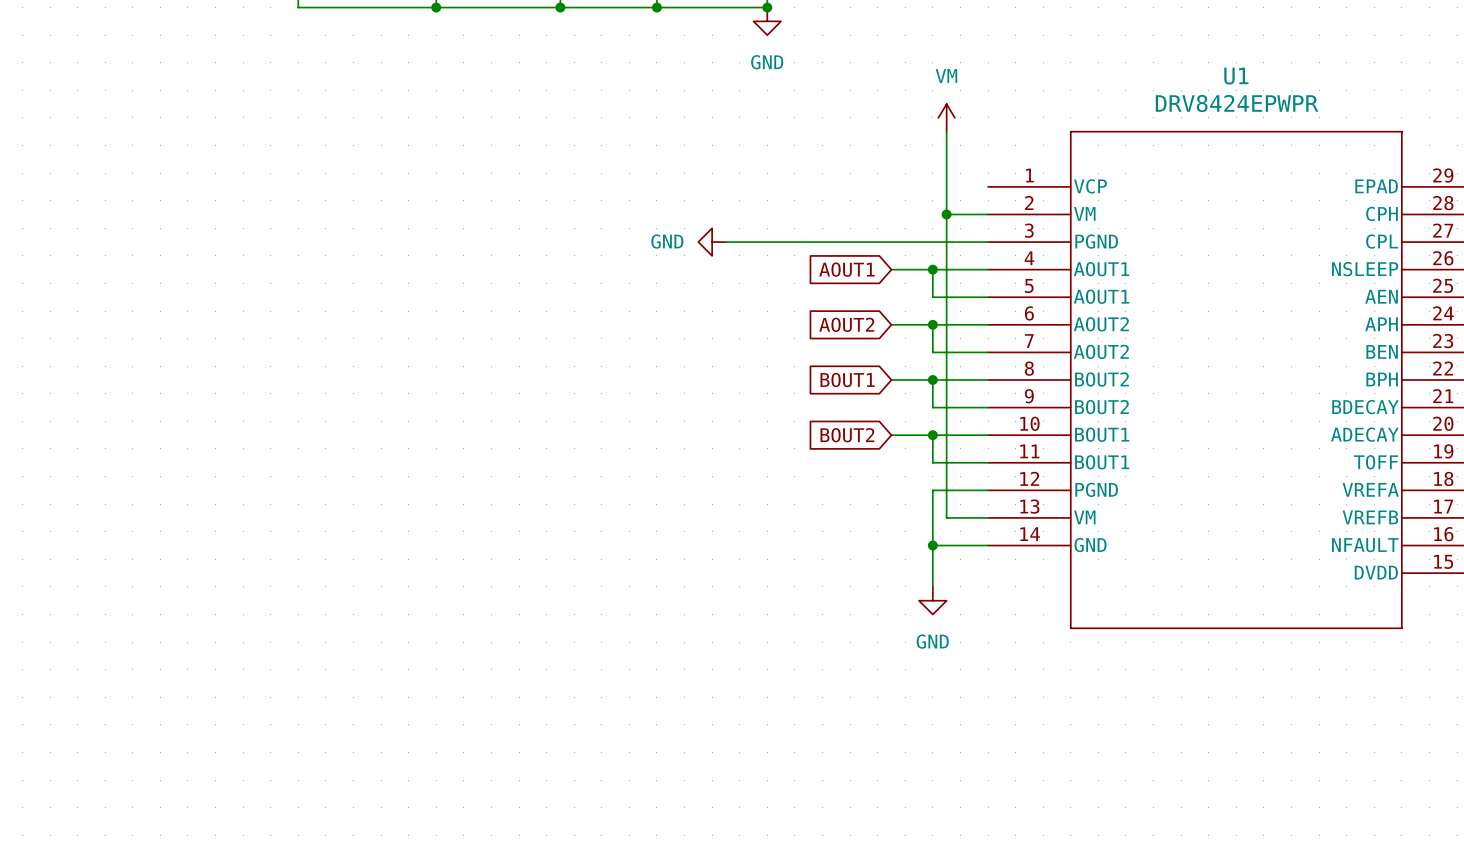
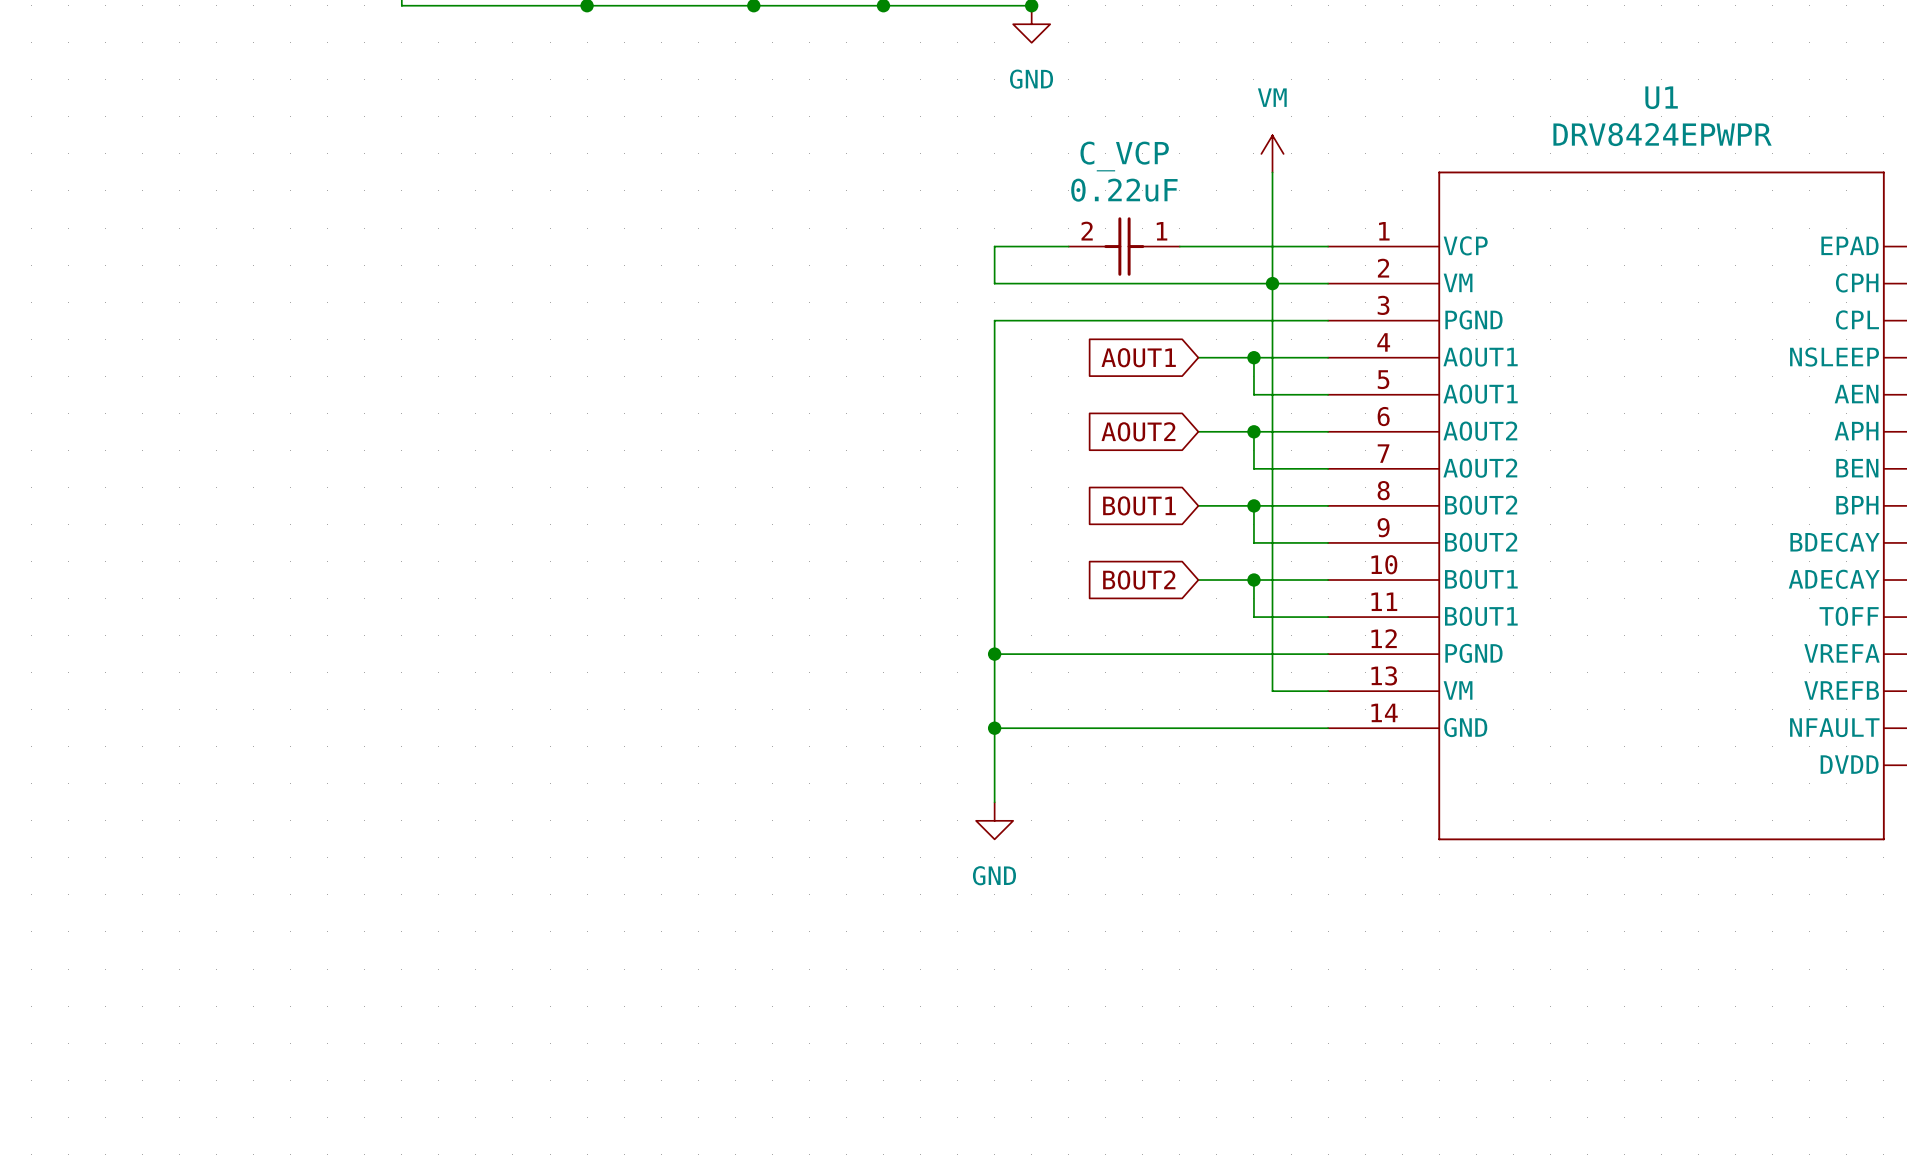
wire: none -> (1068, 246) (994, 246) (994, 283) (1272, 283)
C_VCP: none -> 0.22uF (1124, 246)
wire: none -> (1179, 246) (1328, 246)
power symbol: GND (712, 242) -> none
wire: (725, 242) (739, 242) -> (994, 802) (994, 320)
junction: none -> (994, 654)
wire: (932, 490) (932, 586) -> (1253, 654) (994, 654)
wire: none -> (994, 728) (1253, 728)
junction: none -> (994, 728)
junction: (932, 545) -> none
power symbol: GND (932, 600) -> none
power symbol: none -> GND (994, 820)

